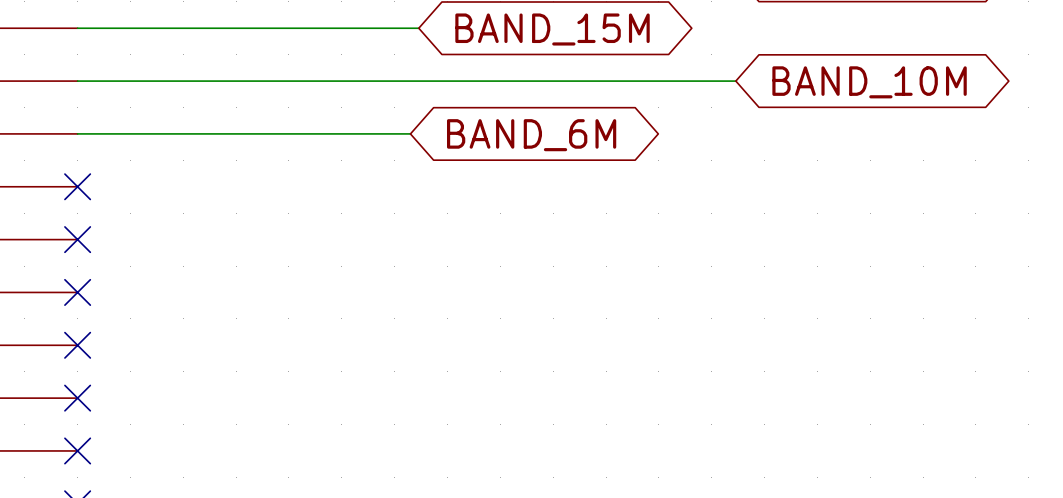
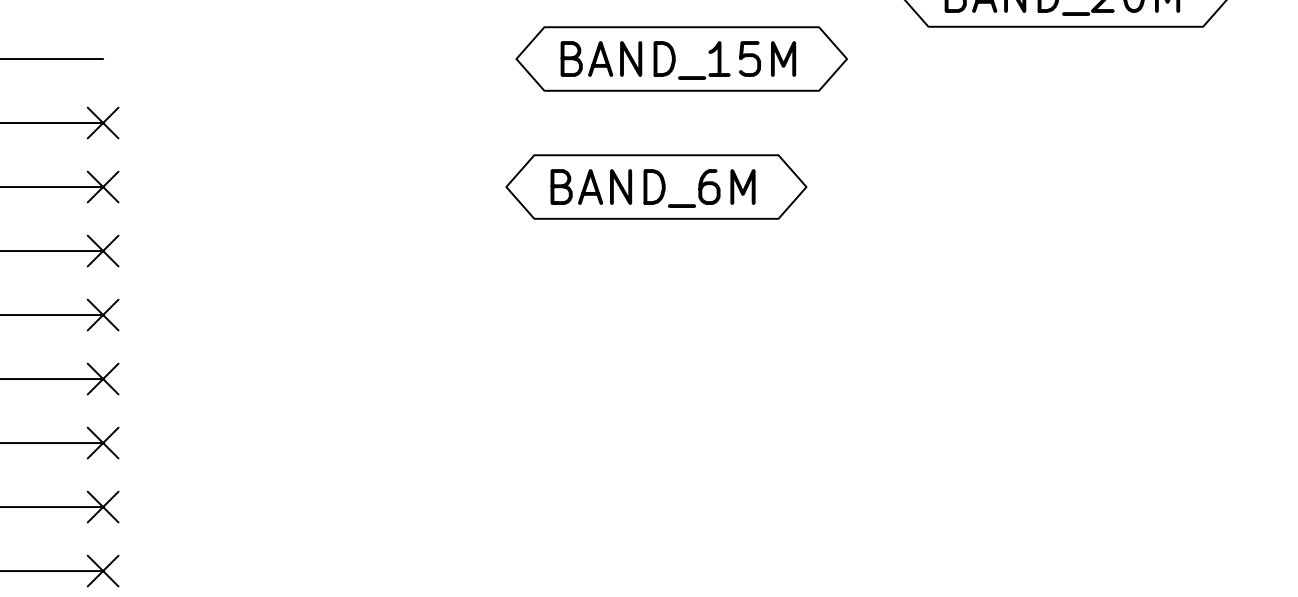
wire: (77, 28) (418, 28) -> none
wire: (77, 81) (735, 81) -> none
no-connect mark: none -> (103, 123)
global label: BAND_10M (869, 82) -> none
wire: (77, 133) (410, 133) -> none
no-connect mark: none -> (103, 187)

